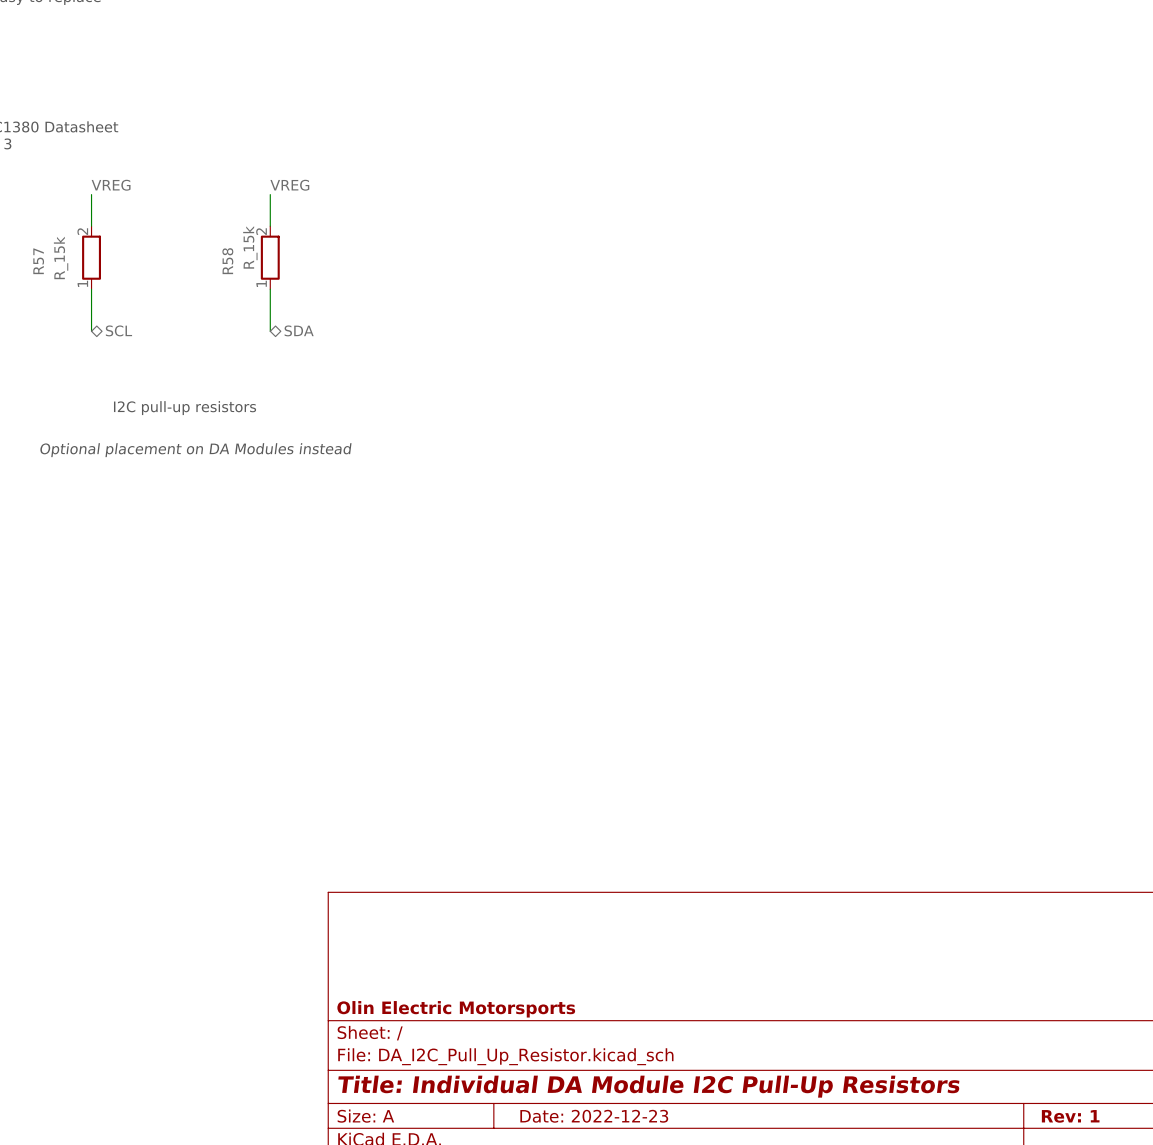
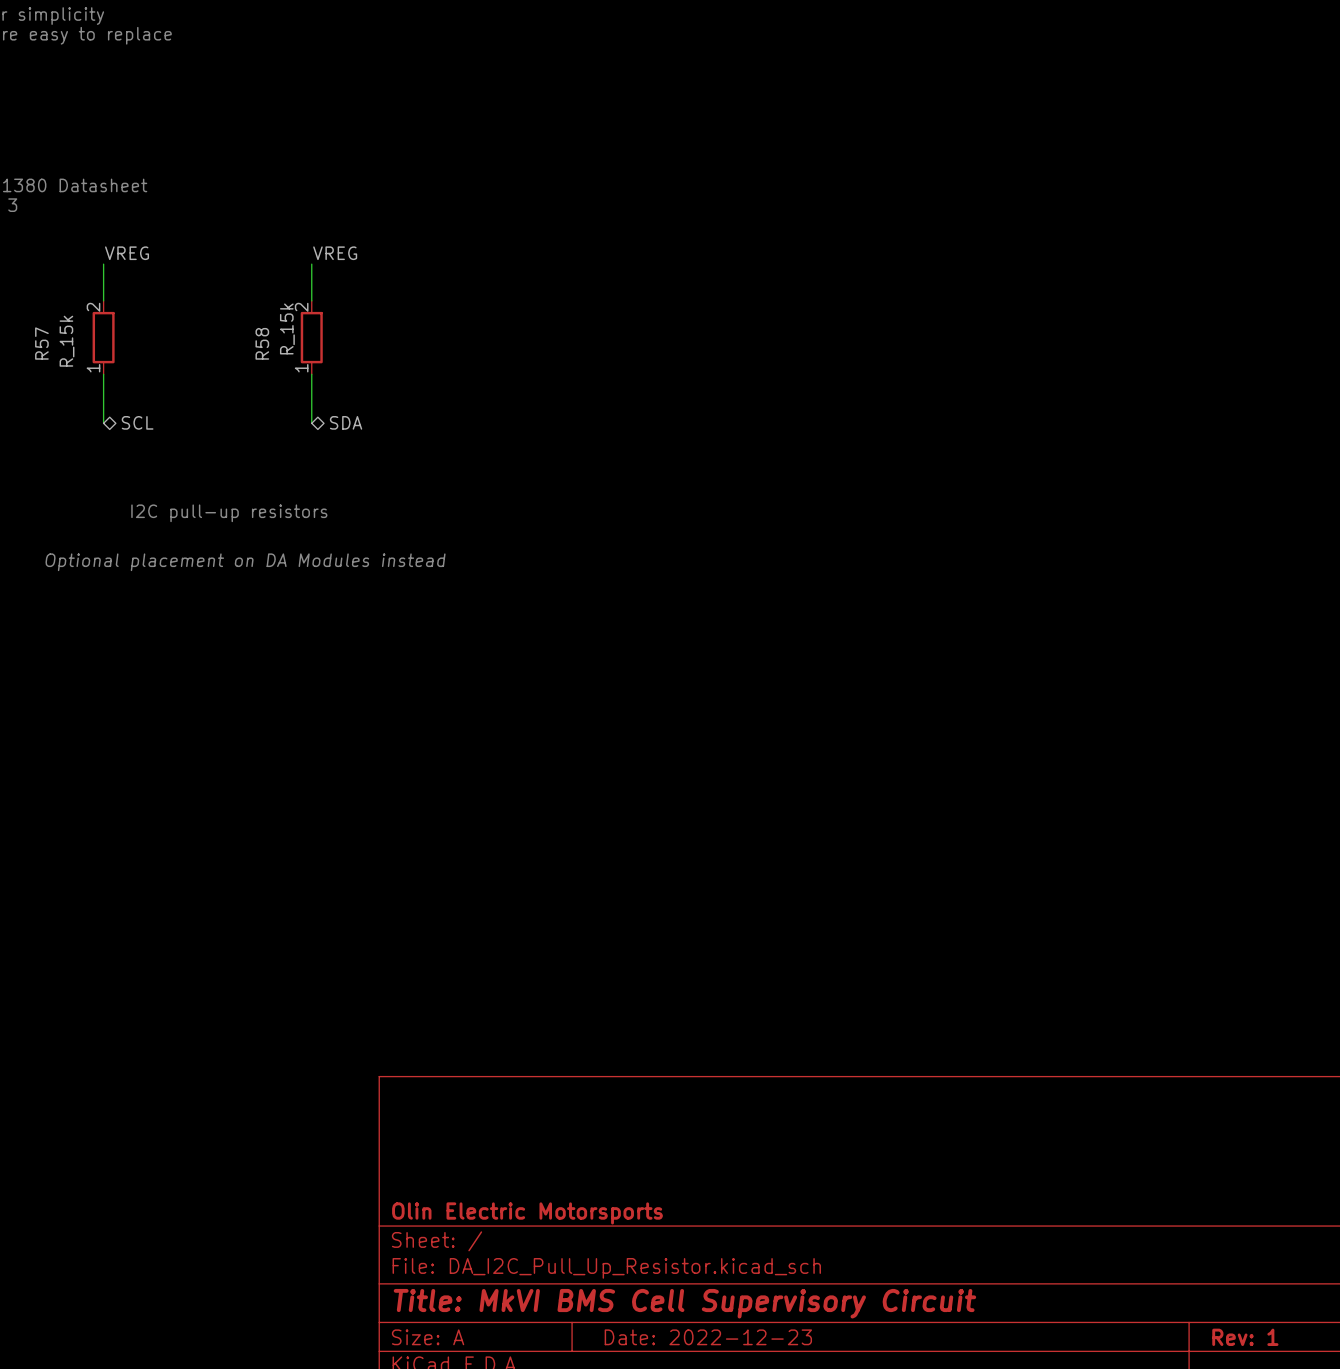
title block: Title: Individual DA Module I2C Pull-Up Resistors (648, 1086) -> Title: MkVI BMS Cell Supervisory Circuit (684, 1303)

